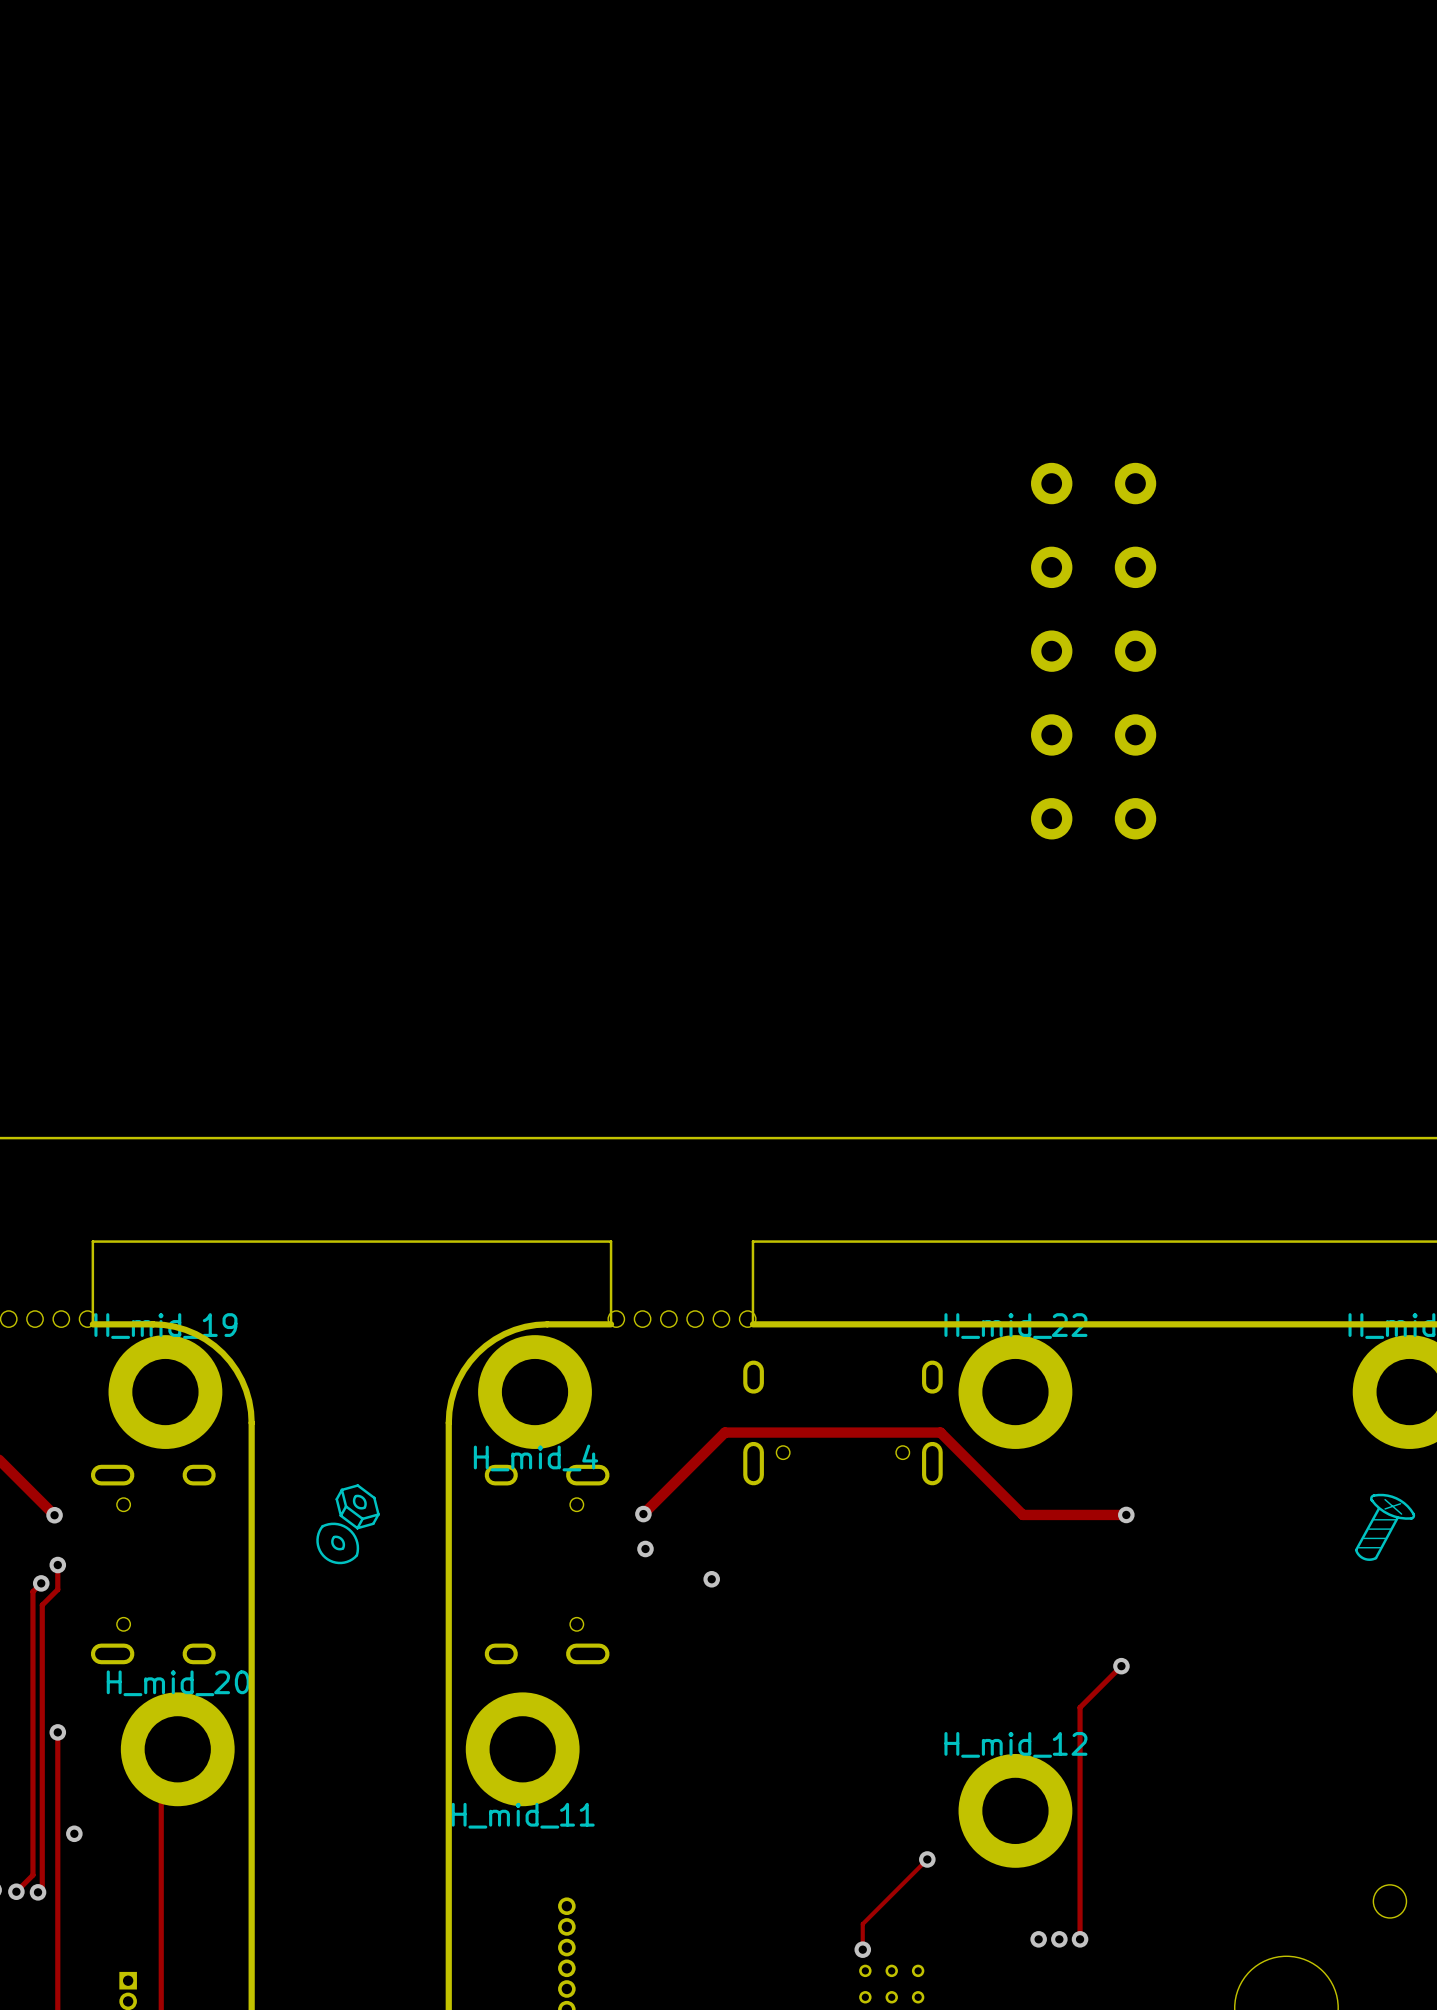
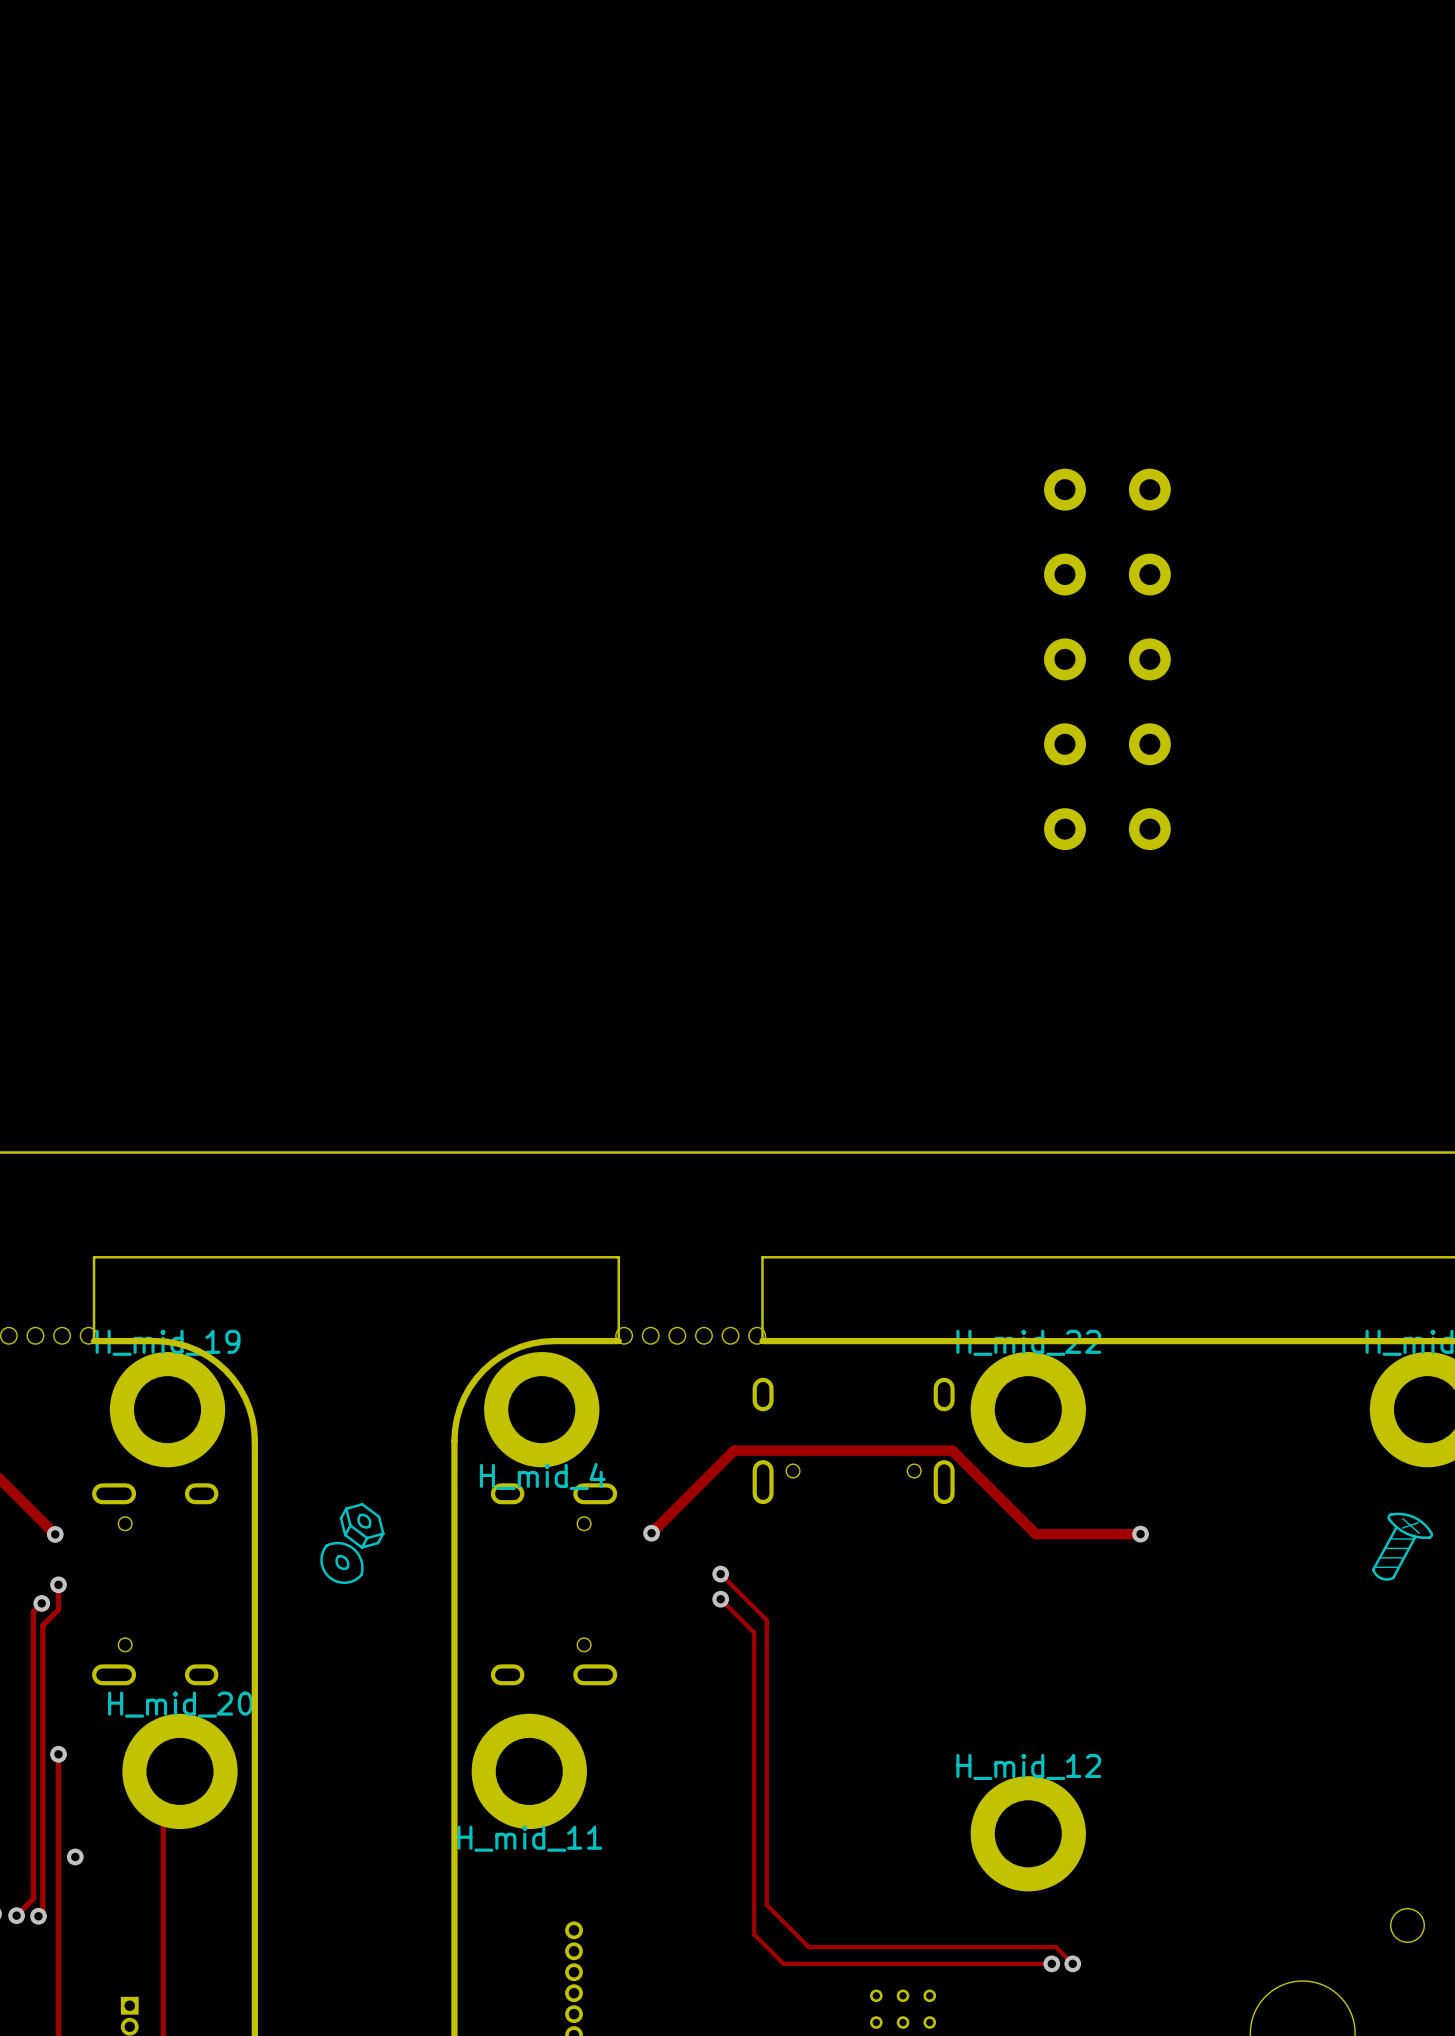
via position: (645, 1548) -> (720, 1574)
track: none -> (720, 1574) (766, 1620) (766, 1905) (808, 1947) (1055, 1947) (1072, 1963)
track: none -> (720, 1599) (754, 1632) (754, 1934) (783, 1963) (1051, 1963)
track: (1121, 1666) (1080, 1707) (1080, 1939) -> none
via: (1121, 1666) -> none
track: (927, 1859) (862, 1924) (862, 1949) -> none
via: (927, 1859) -> none
via: (1080, 1939) -> none
via: (862, 1949) -> none

